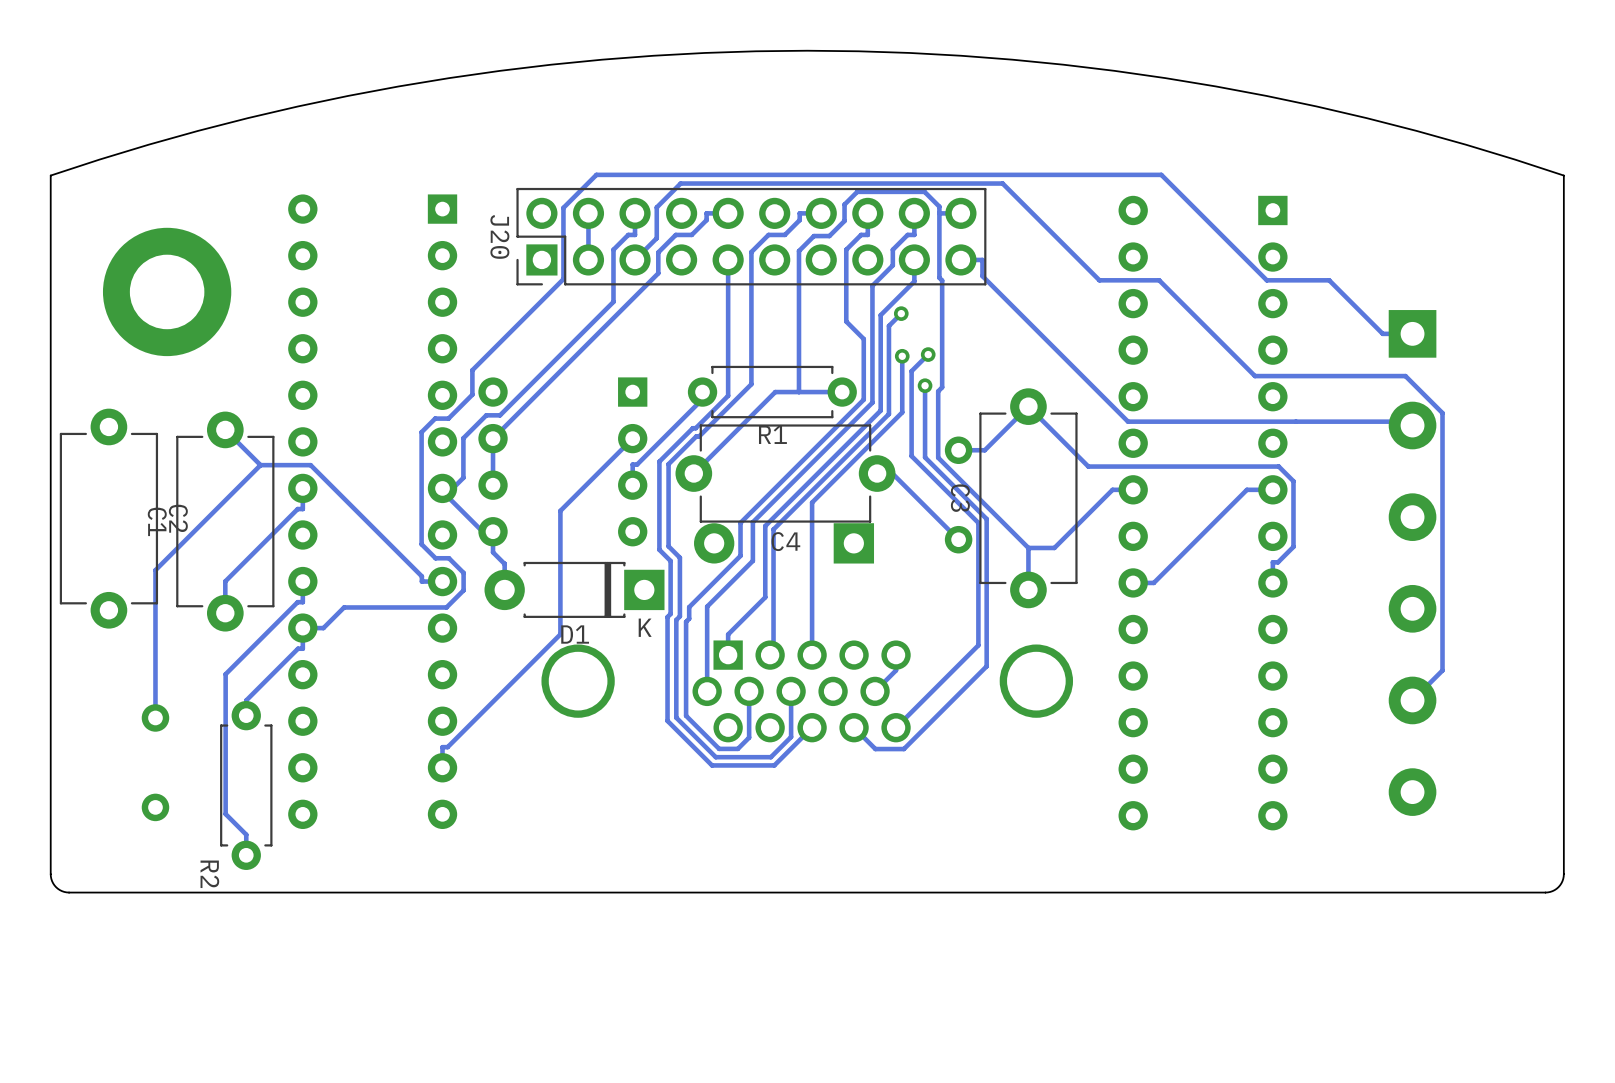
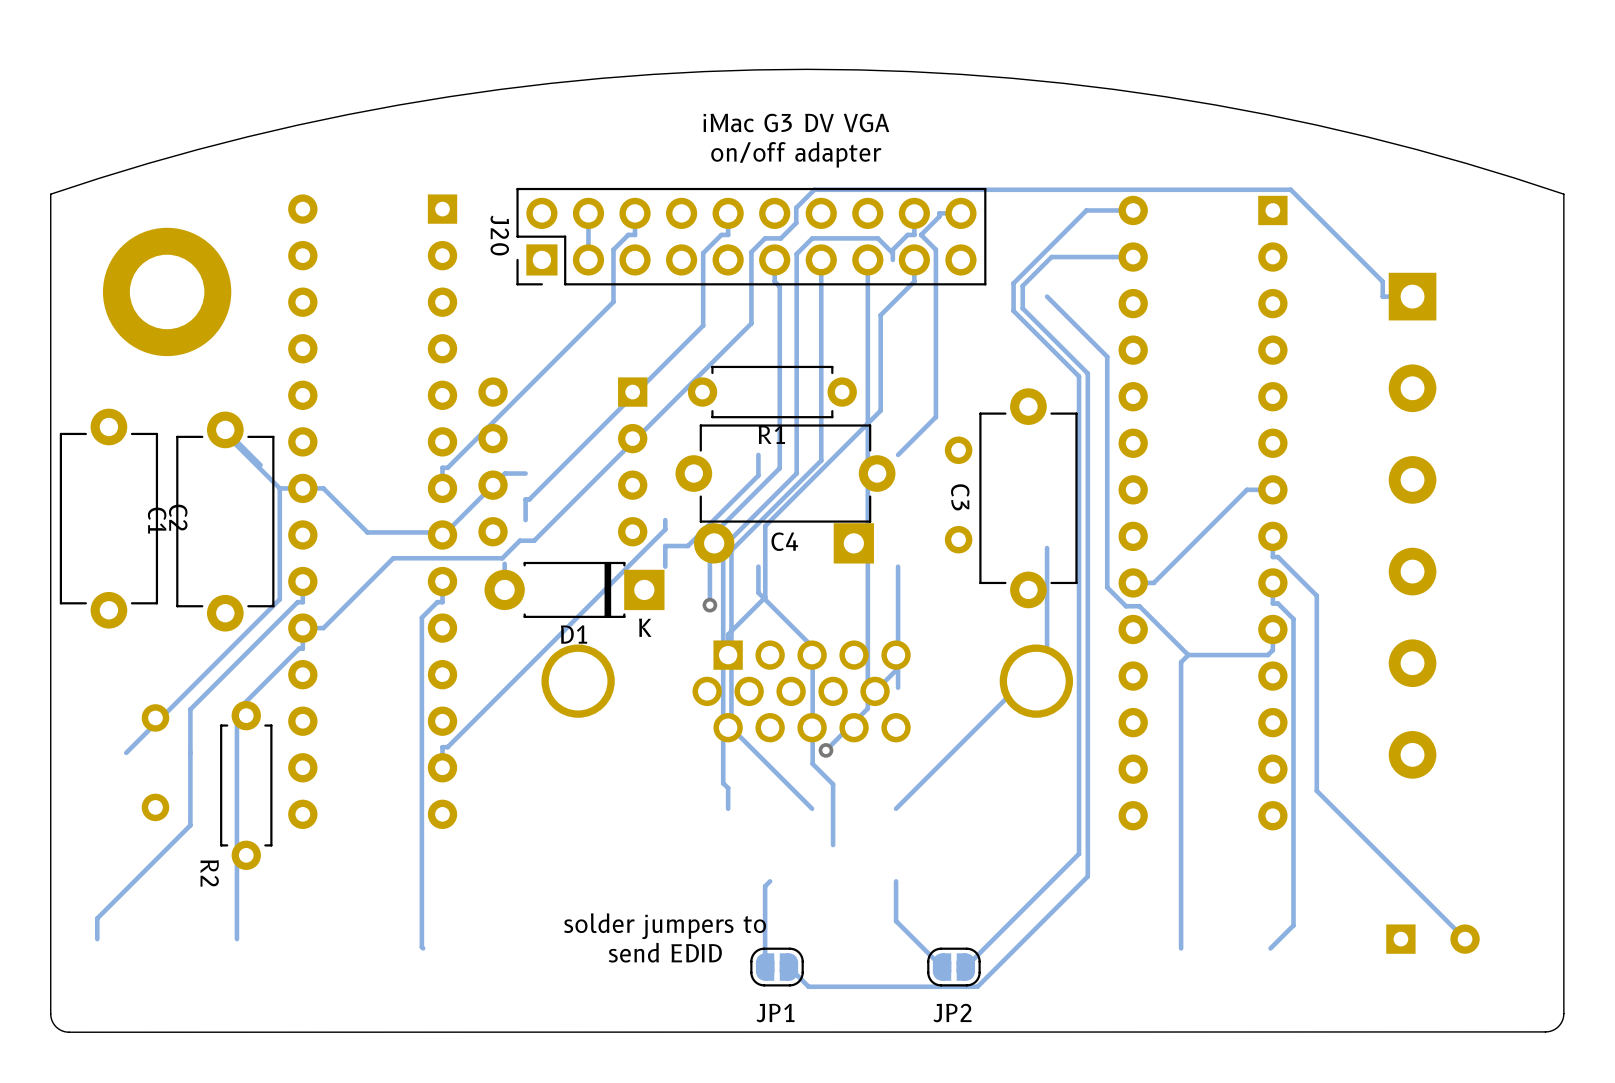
text: none -> iMac G3 DV VGA (796, 122)
text: none -> on/off adapter (796, 154)
board edge: (1563, 194) (1563, 175) (1416, 130) (1266, 95) (1165, 78) (1063, 64) (909, 52) (807, 50) (704, 52) (602, 59) (500, 70) (348, 95) (198, 130) (50, 175) (50, 194) -> (1563, 194) (1416, 149) (1316, 125) (1216, 105) (1114, 89) (1012, 78) (909, 71) (807, 69) (653, 74) (551, 83) (449, 96) (348, 114) (247, 136) (148, 163) (50, 194)
track: none -> (1133, 210) (1086, 210) (1013, 283) (1013, 310) (1079, 376) (1079, 853) (965, 967)
track: (728, 213) (706, 213) (706, 220) (691, 234) (675, 234) (658, 252) (658, 273) (493, 438) (493, 485) -> (728, 213) (728, 234) (721, 234) (703, 253) (703, 325) (529, 499) (525, 499) (525, 520)
track: (821, 213) (799, 213) (799, 220) (784, 234) (768, 234) (751, 252) -> (1412, 296) (1382, 296) (1382, 281) (1290, 189) (814, 189) (796, 207) (796, 223) (780, 238) (765, 238) (751, 252)
track: (867, 213) (867, 234) (861, 234) (846, 249) (846, 321) (863, 339) (863, 399) (740, 522) (740, 555) (689, 607) (689, 618) (686, 621) (686, 715) (719, 748) (737, 748) (749, 737) (749, 691) -> none
track: (939, 213) (939, 206) (924, 191) (857, 191) (844, 204) (844, 220) (829, 236) (813, 236) (798, 251) (798, 392) -> none
track: (939, 216) (939, 277) (942, 280) (942, 387) (938, 391) (938, 457) (1028, 547) -> (939, 216) (921, 234) (935, 249) (935, 417) (898, 454)
track: none -> (892, 253) (878, 238) (812, 238) (796, 253) (796, 473) (723, 546) (723, 783) (728, 788) (728, 808)
track: none -> (1133, 257) (1051, 257) (1022, 285) (1022, 308) (1087, 373) (1087, 876) (977, 986) (808, 986) (788, 967)
track: (635, 259) (656, 238) (656, 207) (680, 183) (1002, 183) (1099, 280) (1159, 280) (1254, 376) (1405, 376) (1442, 413) (1442, 670) (1412, 700) -> none
track: (728, 259) (728, 395) (659, 461) (659, 549) (670, 561) (670, 613) (667, 617) (667, 720) (712, 765) (774, 765) (812, 727) -> none
track: none -> (774, 259) (774, 281) (779, 286) (779, 468) (709, 538) (709, 605)
track: none -> (821, 259) (821, 460) (731, 550) (731, 728) (812, 808)
track: none -> (867, 259) (867, 708) (825, 750)
track: (892, 259) (892, 265) (872, 285) (872, 402) (752, 522) (752, 560) (707, 606) (707, 691) -> none
track: (960, 259) (982, 259) (982, 276) (1128, 421) (1408, 421) (1412, 425) -> none
track: none -> (1047, 296) (1107, 356) (1107, 587) (1126, 606) (1139, 606) (1188, 655)
track: (613, 301) (500, 415) (486, 415) (463, 438) (463, 477) (442, 498) -> (613, 301) (447, 467) (442, 467) (442, 488)
track: (901, 313) (888, 325) (888, 414) (773, 529) (773, 651) (770, 655) -> none
via: (901, 313) -> none
track: (751, 323) (751, 384) (668, 464) (668, 546) (679, 557) (679, 616) (676, 619) (676, 717) (715, 757) (770, 757) (791, 737) (791, 691) -> (751, 323) (534, 540) (519, 540) (502, 558) (448, 558)
track: (1412, 333) (1382, 333) (1329, 280) (1266, 280) (1161, 174) (596, 174) (563, 207) (563, 279) (472, 370) (472, 394) (448, 418) (435, 418) (421, 432) (421, 544) (435, 558) -> none
track: (928, 354) (911, 371) (911, 456) (978, 522) (978, 645) (896, 727) -> none
via: (928, 354) -> none
track: (902, 356) (902, 412) (812, 502) (812, 655) -> none
via: (902, 356) -> none
track: (925, 385) (925, 457) (986, 519) (986, 666) (903, 749) (875, 749) (854, 727) -> none
via: (925, 385) -> none
track: (702, 392) (702, 399) (637, 464) (632, 464) (632, 485) -> none
track: (842, 392) (775, 392) (693, 473) -> none
track: none -> (218, 426) (279, 488)
track: (632, 438) (560, 510) (560, 634) -> (665, 520) (665, 529) (560, 634)
track: (958, 450) (984, 450) (1028, 406) (1088, 466) (1278, 466) (1293, 481) (1293, 546) (1278, 562) (1272, 562) (1272, 582) -> (1270, 948) (1293, 925) (1293, 619) (1278, 603) (1272, 603) (1272, 582)
track: none -> (758, 454) (758, 475) (687, 546) (665, 546) (665, 566)
track: none -> (525, 473) (504, 473) (446, 532) (367, 532) (323, 488) (279, 488)
track: (877, 473) (892, 473) (958, 539) -> none
track: none -> (279, 488) (279, 599) (126, 752)
track: (302, 488) (302, 509) (297, 509) (225, 581) (225, 613) -> none
track: (1133, 489) (1112, 489) (1054, 547) (1028, 547) -> none
track: (442, 498) (449, 498) (493, 542) -> none
track: (493, 531) (493, 552) (504, 563) -> none
track: none -> (1272, 536) (1272, 557) (1278, 557) (1316, 595) (1316, 790) (1465, 939)
track: (1028, 547) (1028, 589) -> none
track: none -> (1047, 548) (1047, 657) (896, 808)
track: (448, 558) (463, 572) (463, 590) (446, 607) (344, 607) -> (435, 558) (393, 558) (344, 607)
part position: (1412, 562) -> (1412, 525)
track: none -> (758, 566) (758, 592) (812, 647) (812, 763) (833, 784) (833, 845)
track: none -> (898, 566) (898, 687)
track: (442, 581) (421, 581) (421, 576) (310, 465) (260, 465) (155, 570) (155, 717) -> (442, 581) (442, 602) (437, 602) (421, 617) (423, 948)
via: none -> (709, 605)
track: none -> (1272, 629) (1272, 650) (1267, 655) (1188, 655)
track: (299, 648) (246, 700) (246, 715) -> (299, 648) (236, 710) (236, 939)
track: none -> (1188, 655) (1181, 662) (1181, 948)
track: (225, 674) (225, 814) (246, 834) (246, 855) -> (225, 674) (190, 709) (190, 825) (97, 918) (97, 939)
via: none -> (825, 750)
board edge: (1563, 874) (1558, 887) (1545, 892) (69, 892) (56, 887) (50, 874) -> (1563, 874) (1563, 1016) (1558, 1026) (1547, 1031) (69, 1032) (56, 1026) (50, 1016) (50, 874)
track: none -> (770, 881) (765, 886) (765, 967)
track: none -> (896, 881) (896, 921) (942, 967)
text: none -> solder jumpers to (665, 926)
part: none -> (1432, 939)
text: none -> send EDID (665, 952)
JP1: none -> (777, 967)
JP2: none -> (953, 967)

